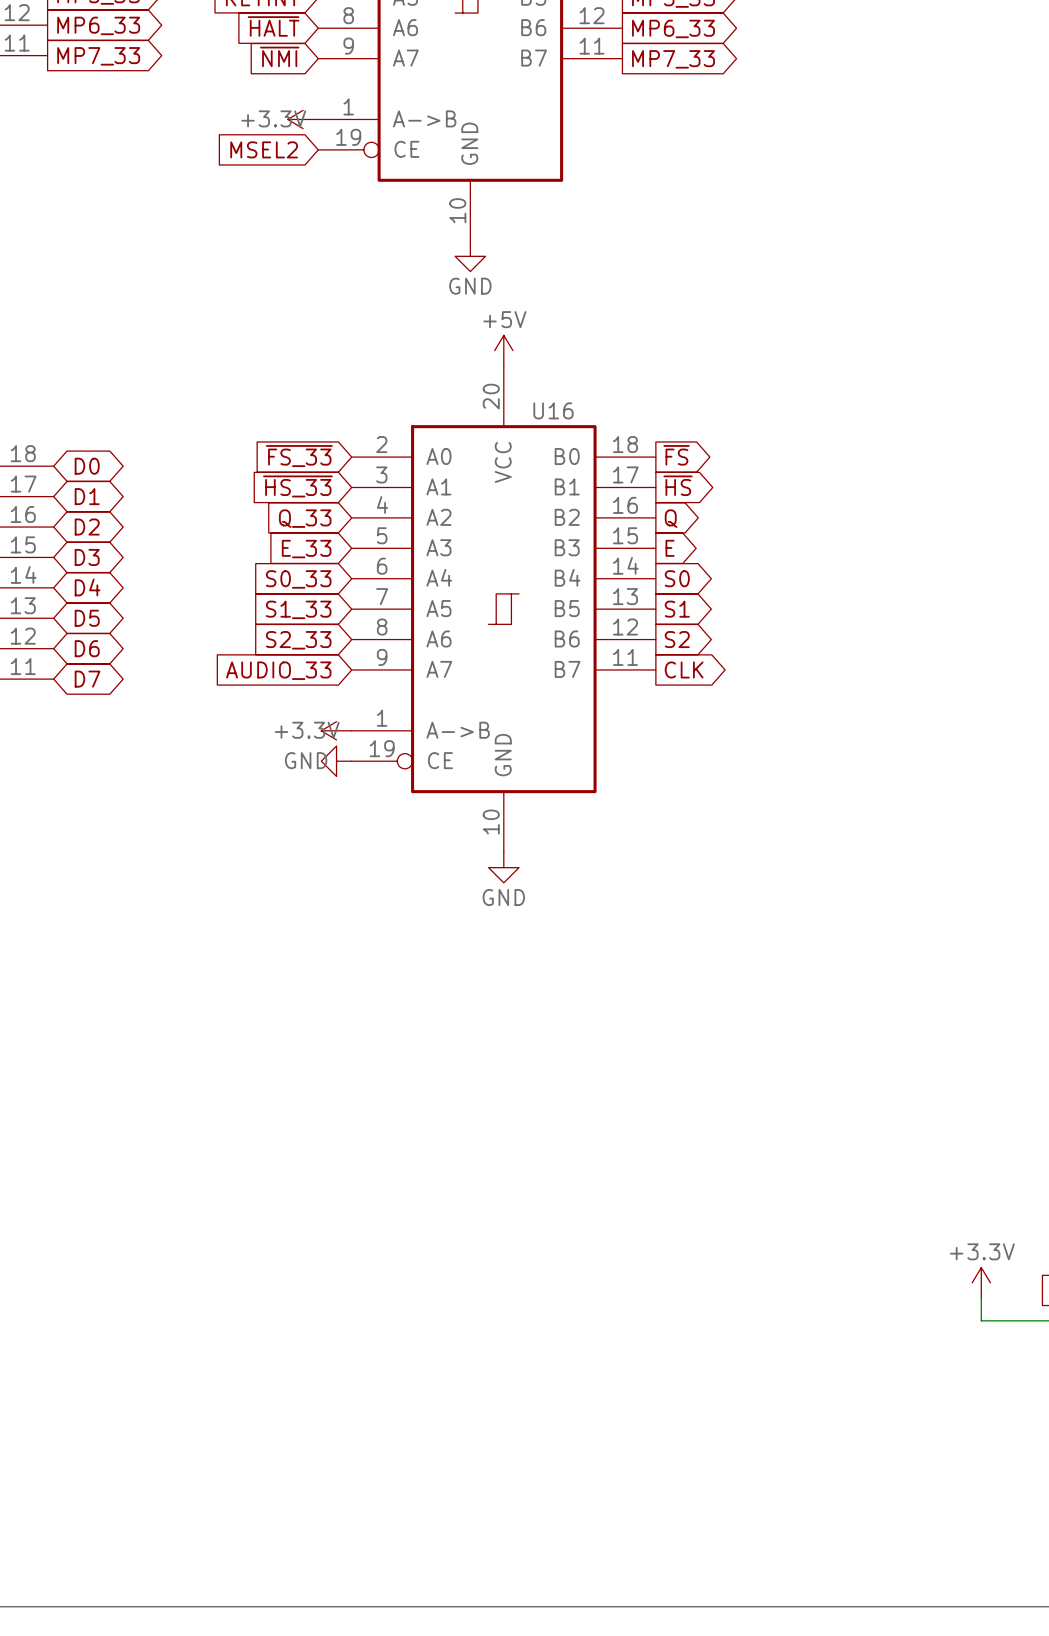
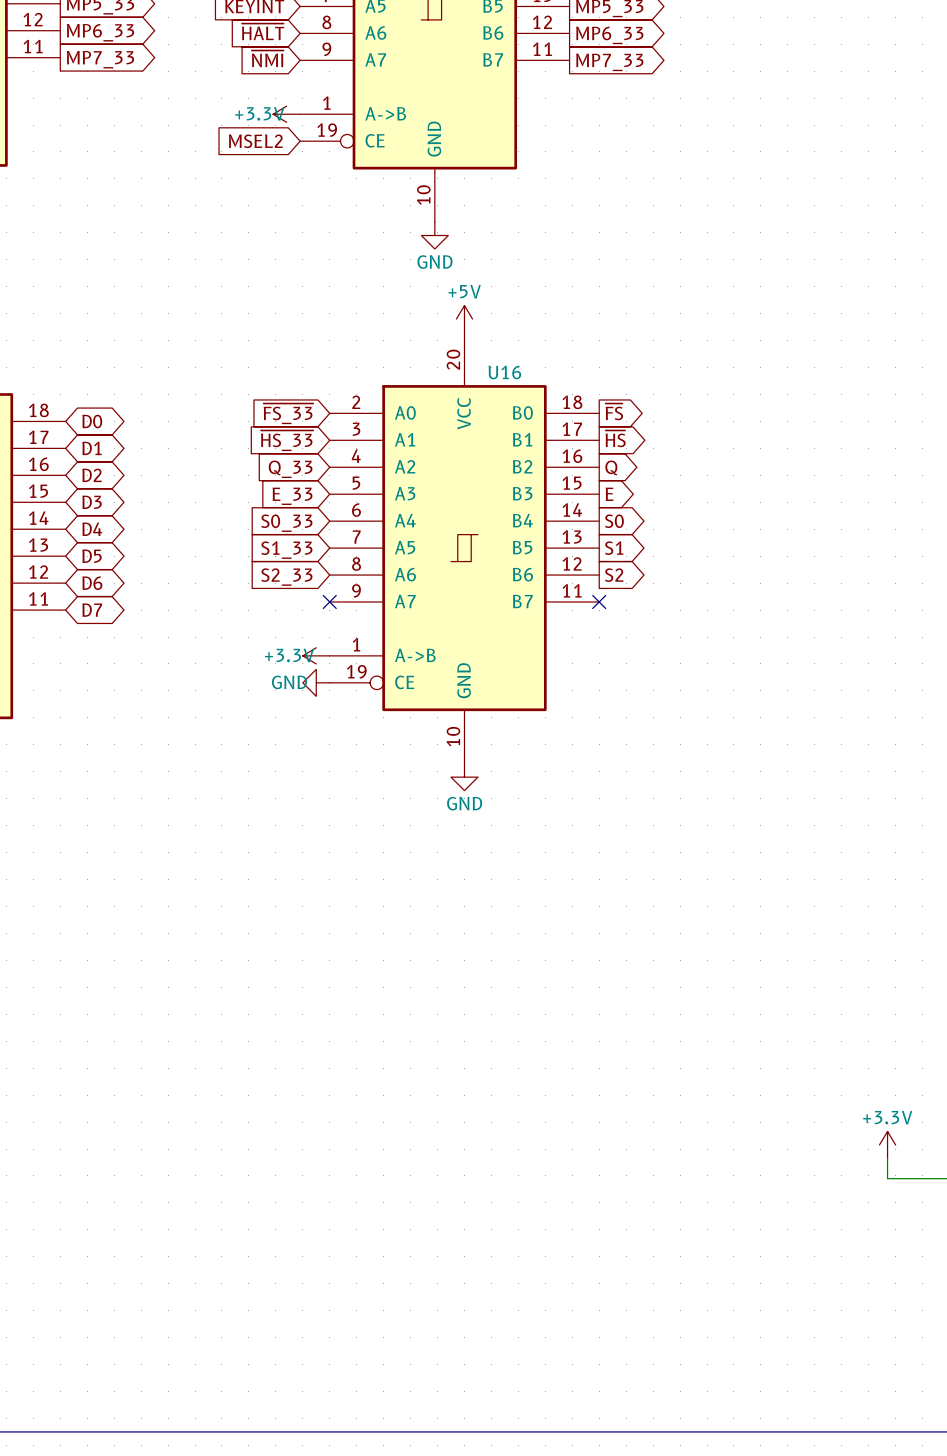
no-connect mark: none -> (329, 601)
no-connect mark: none -> (599, 601)
global label: CLK (684, 669) -> none
global label: AUDIO_33 (278, 670) -> none

